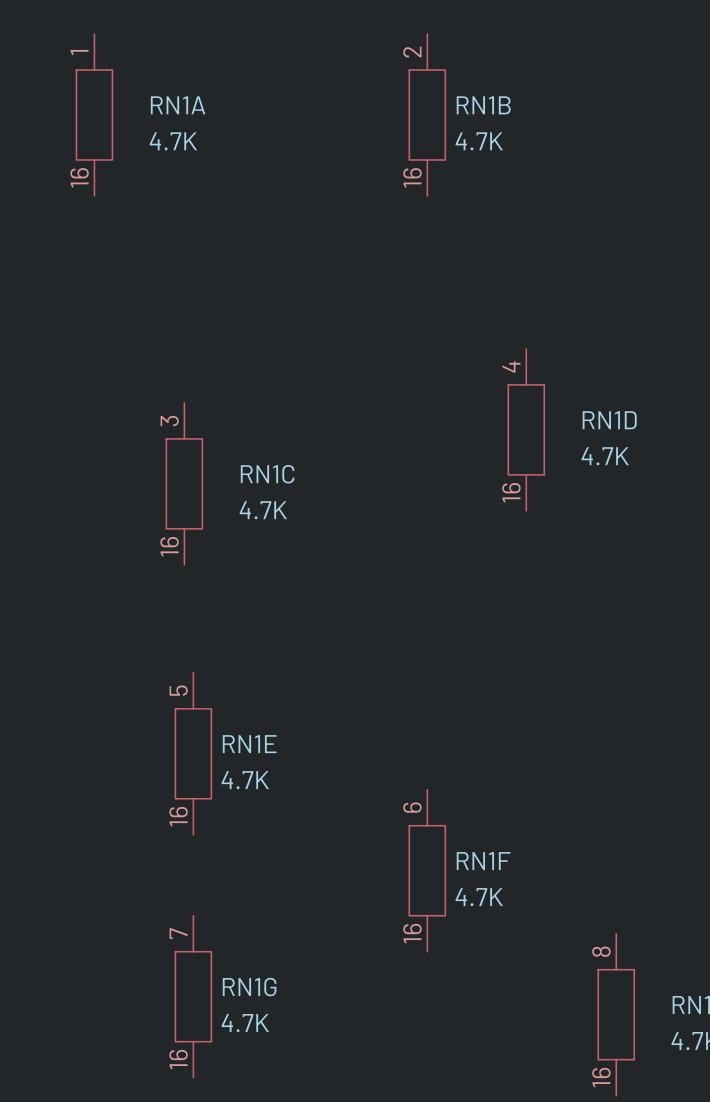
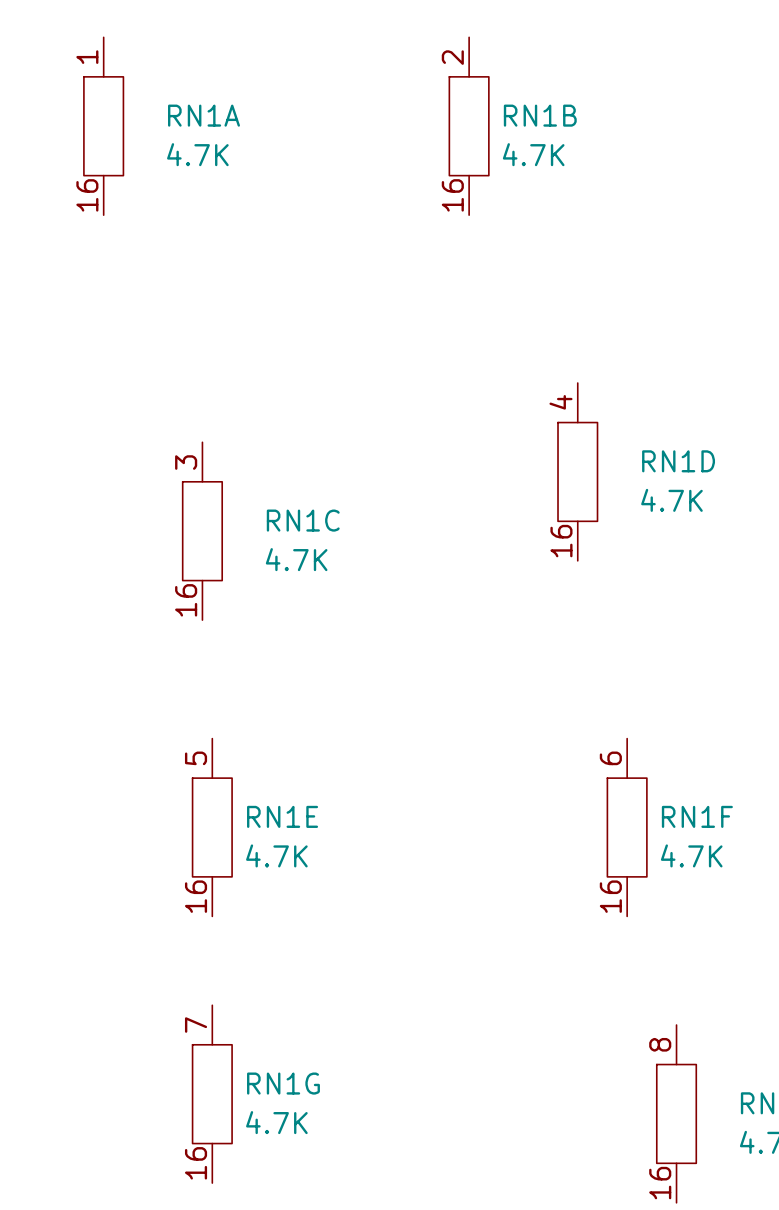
RN1F position: (427, 870) -> (627, 827)

